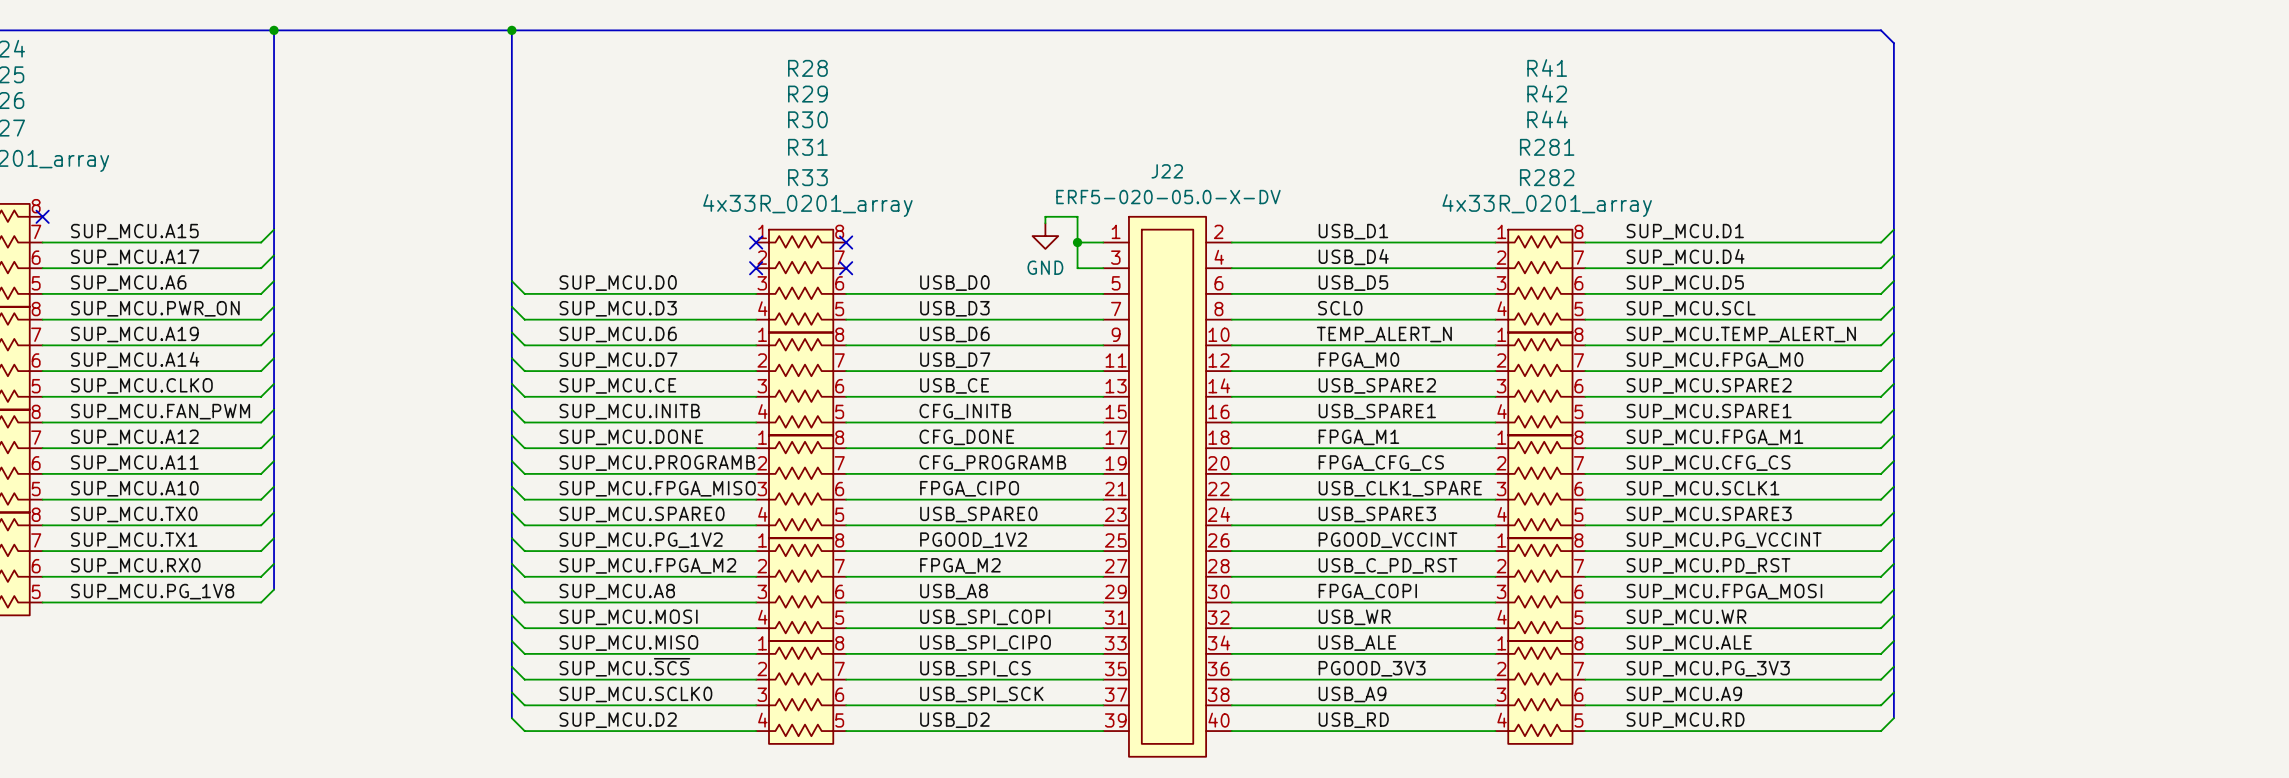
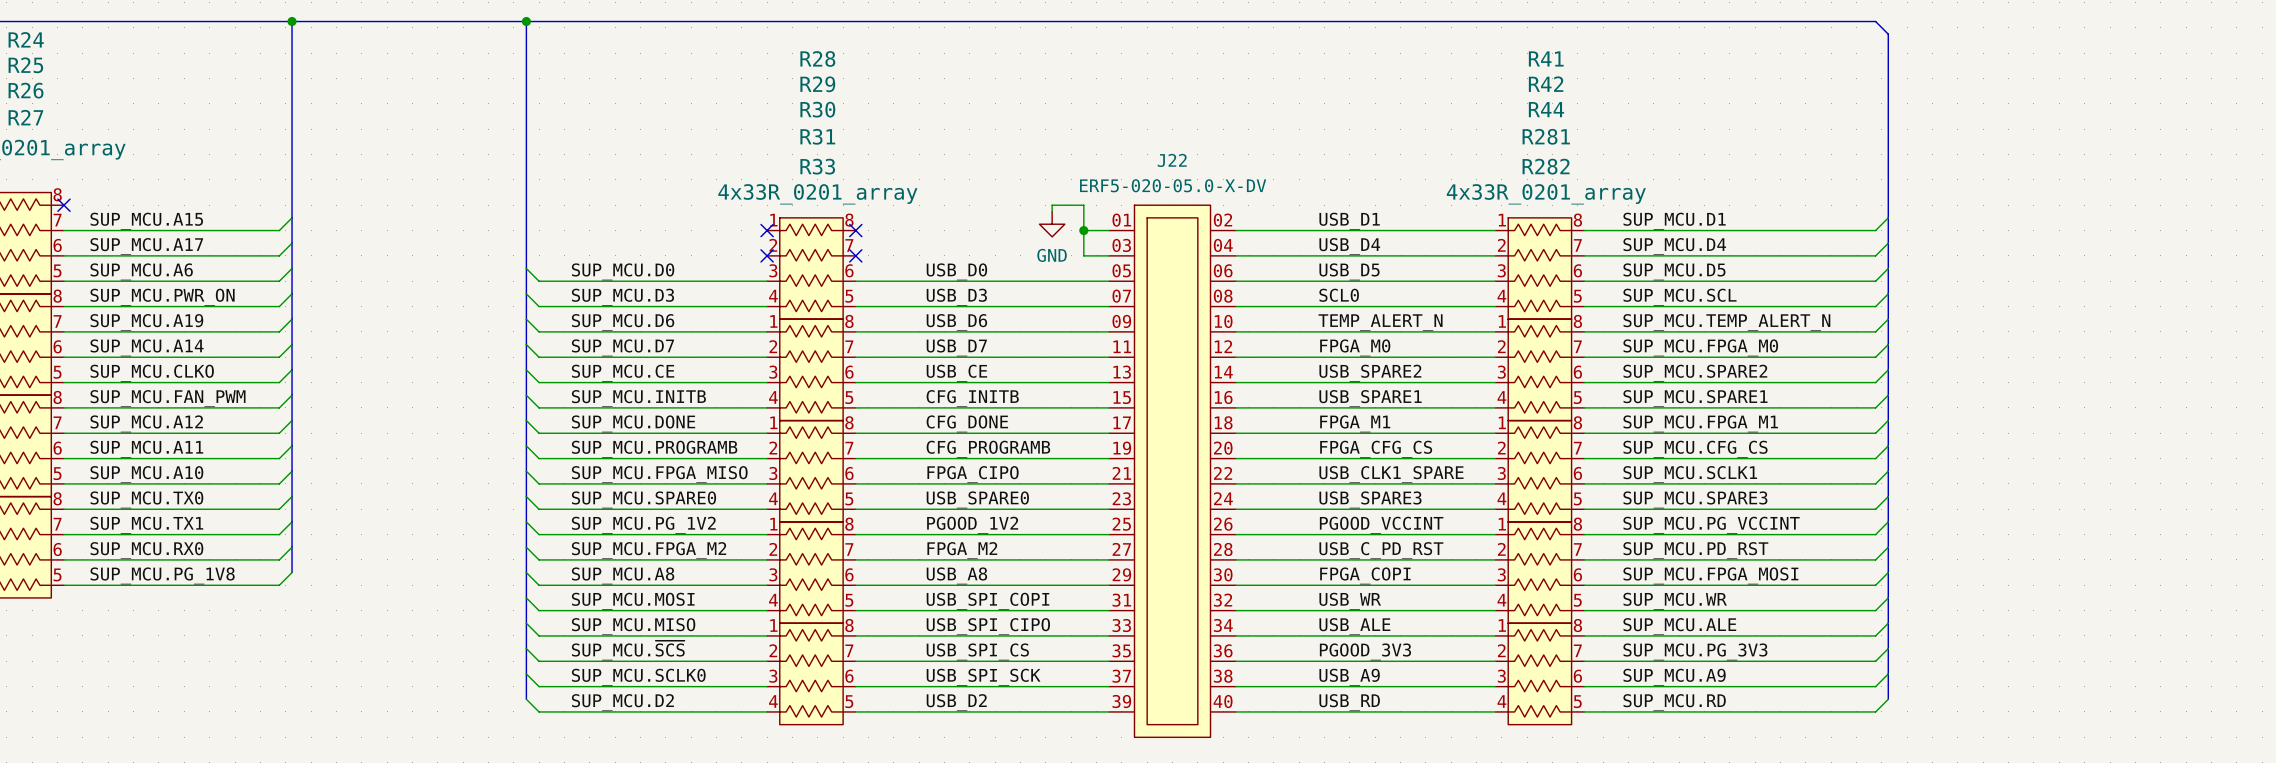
J22 symbol: [1103, 216, 1232, 757] -> [1109, 205, 1236, 738]

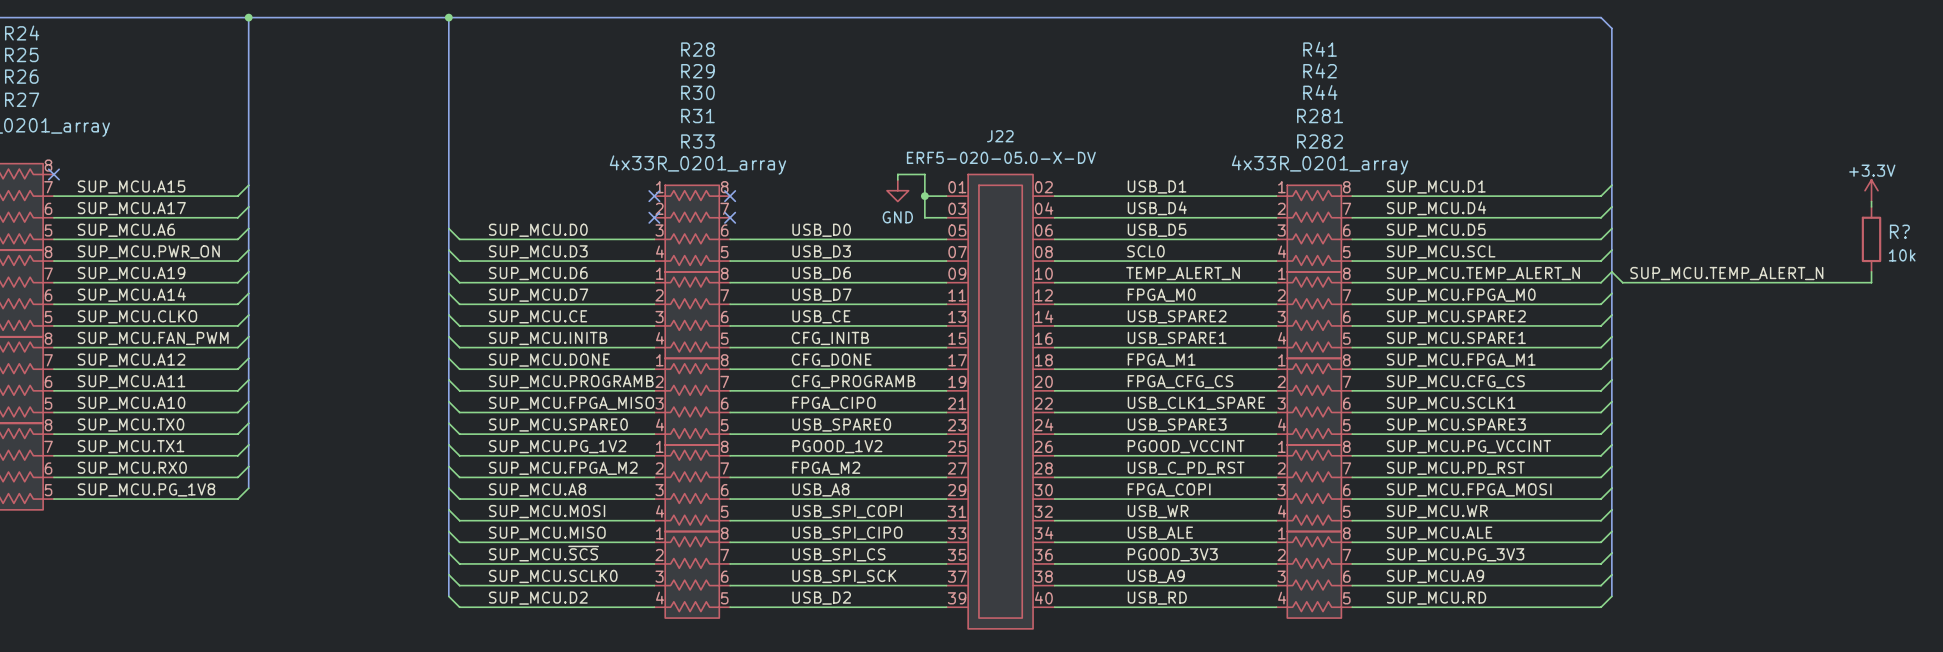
power symbol: none -> +3.3V (1871, 190)
wire: none -> (1871, 201) (1871, 206)
R?: none -> (1871, 239)
wire: none -> (1611, 271) (1622, 282) (1871, 282) (1871, 271)
label: none -> SUP_MCU.TEMP_ALERT_N (1726, 273)

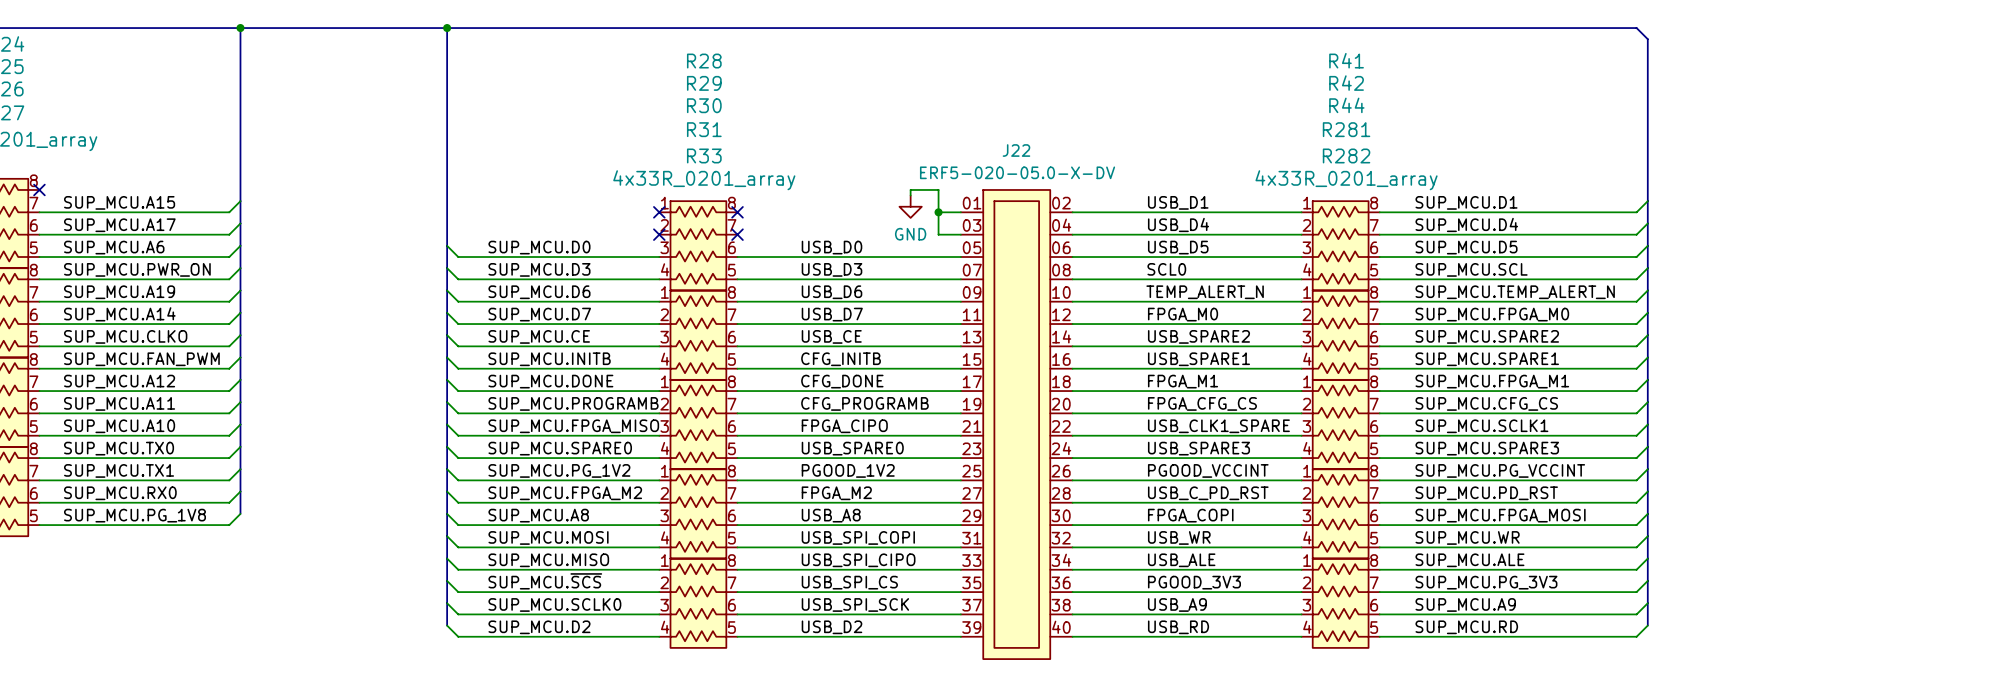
power symbol: +3.3V (1871, 190) -> none
wire: (1871, 201) (1871, 206) -> none
R?: (1871, 239) -> none
wire: (1611, 271) (1622, 282) (1871, 282) (1871, 271) -> none
label: SUP_MCU.TEMP_ALERT_N (1726, 273) -> none

